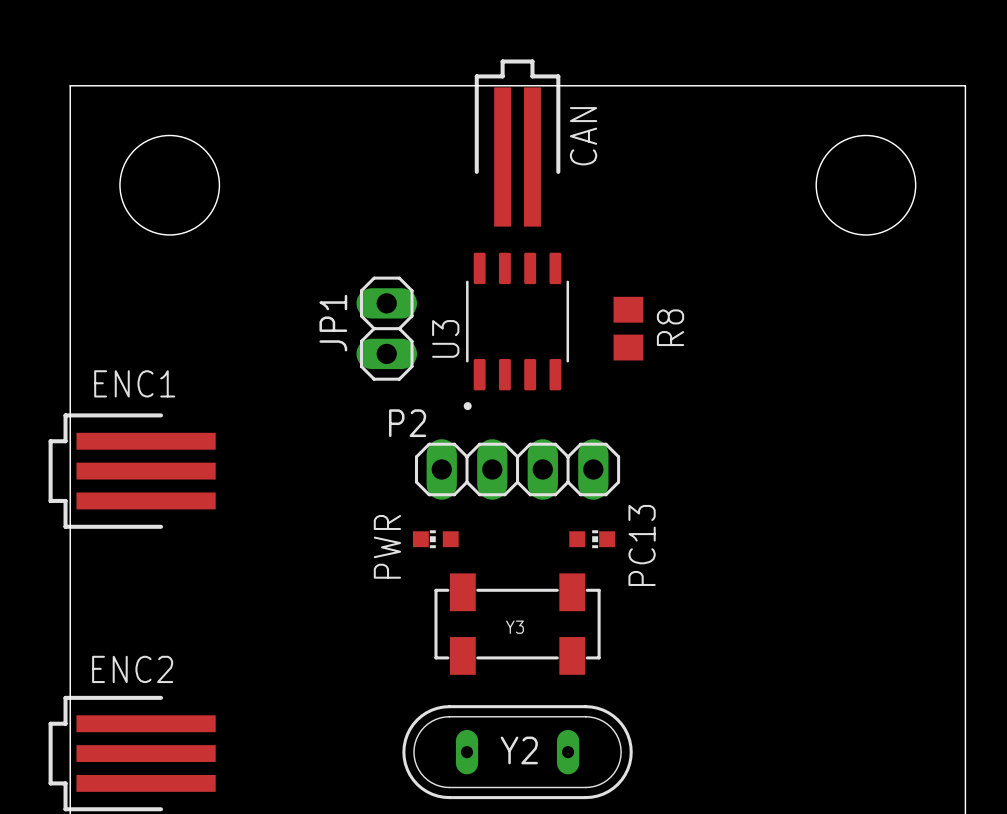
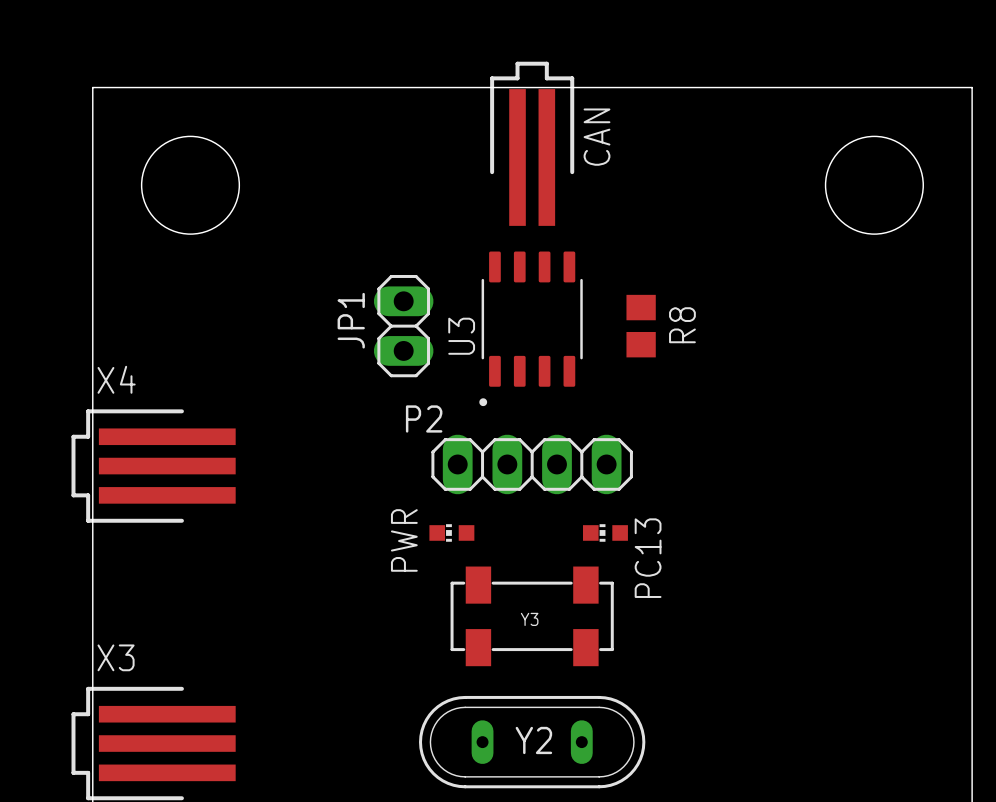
ENC1 name: ENC1 (134, 383) -> X4 (116, 379)
PC13 rotation: 0° (592, 539) -> 180° (605, 532)
ENC2 name: ENC2 (132, 669) -> X3 (116, 657)

